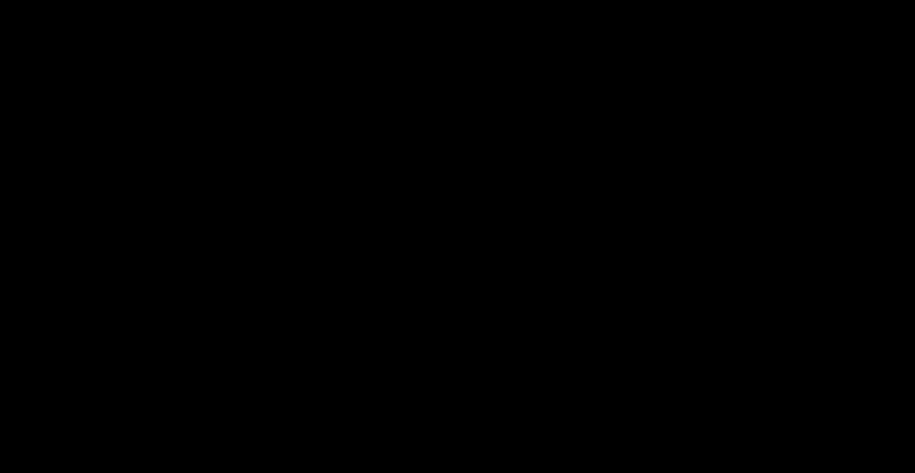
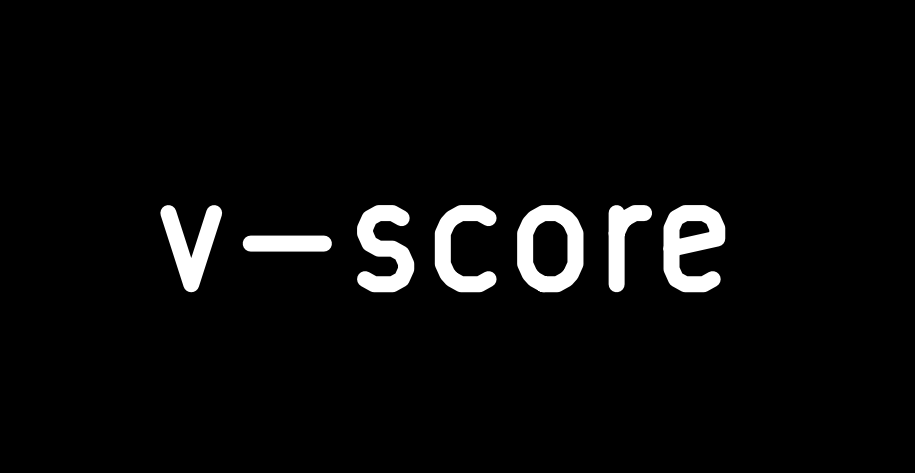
text: none -> v-score (442, 248)

